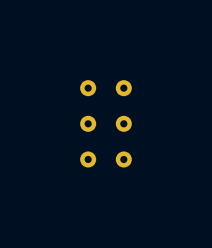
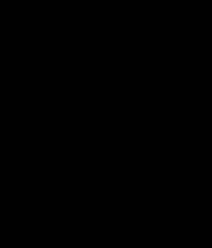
part: (105, 123) -> none

